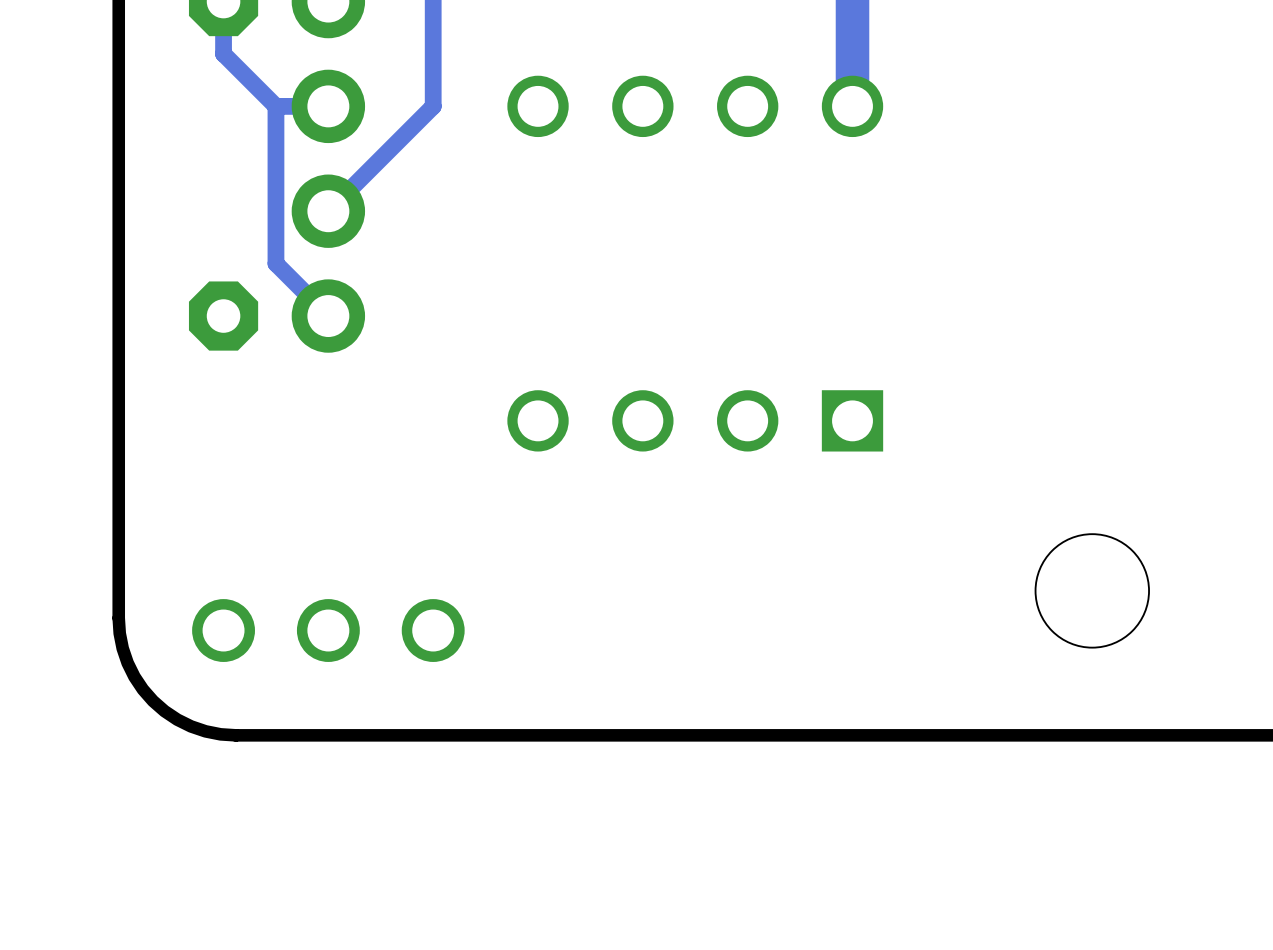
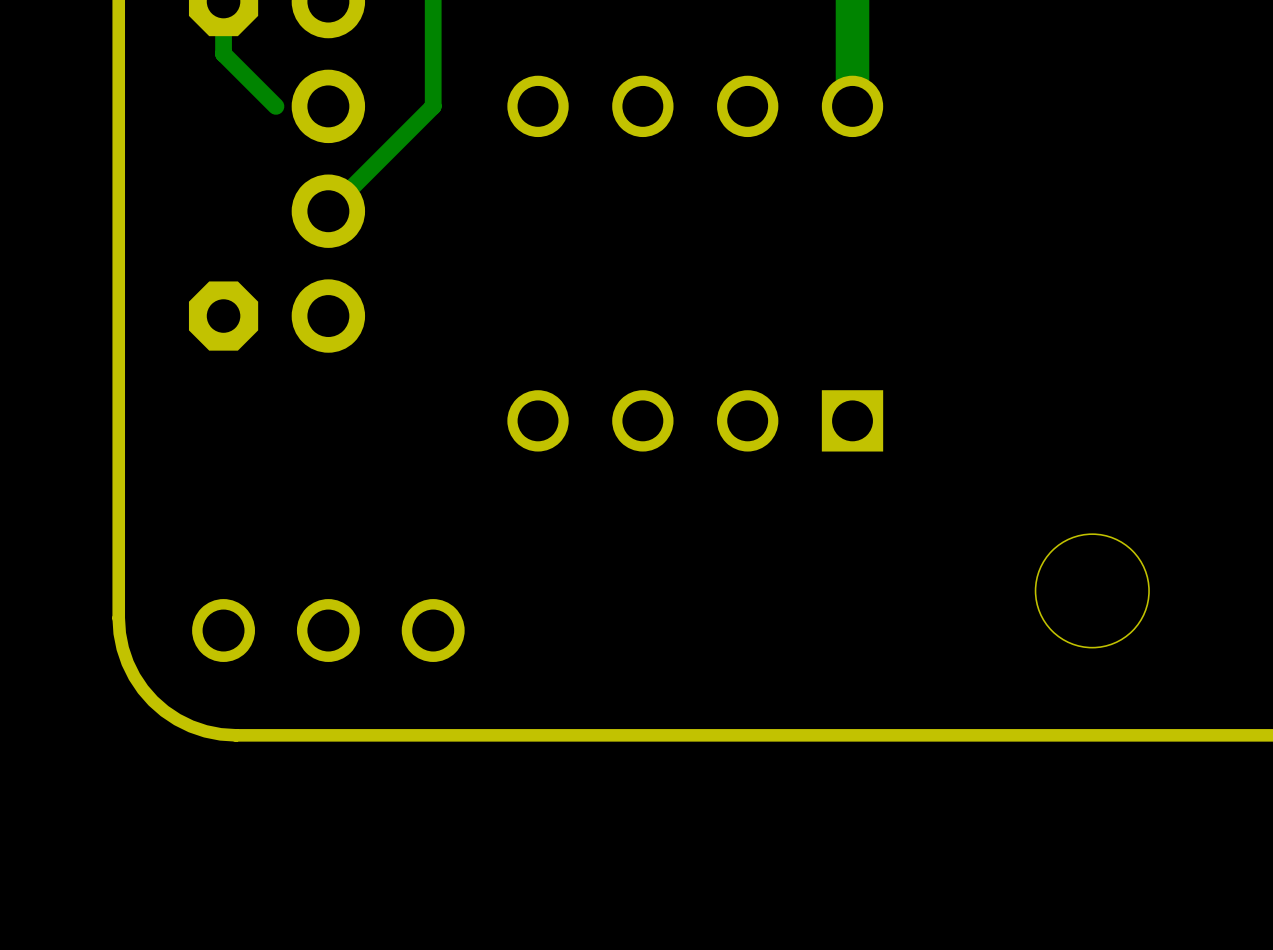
track: (328, 106) (275, 106) (275, 263) (328, 316) -> none

